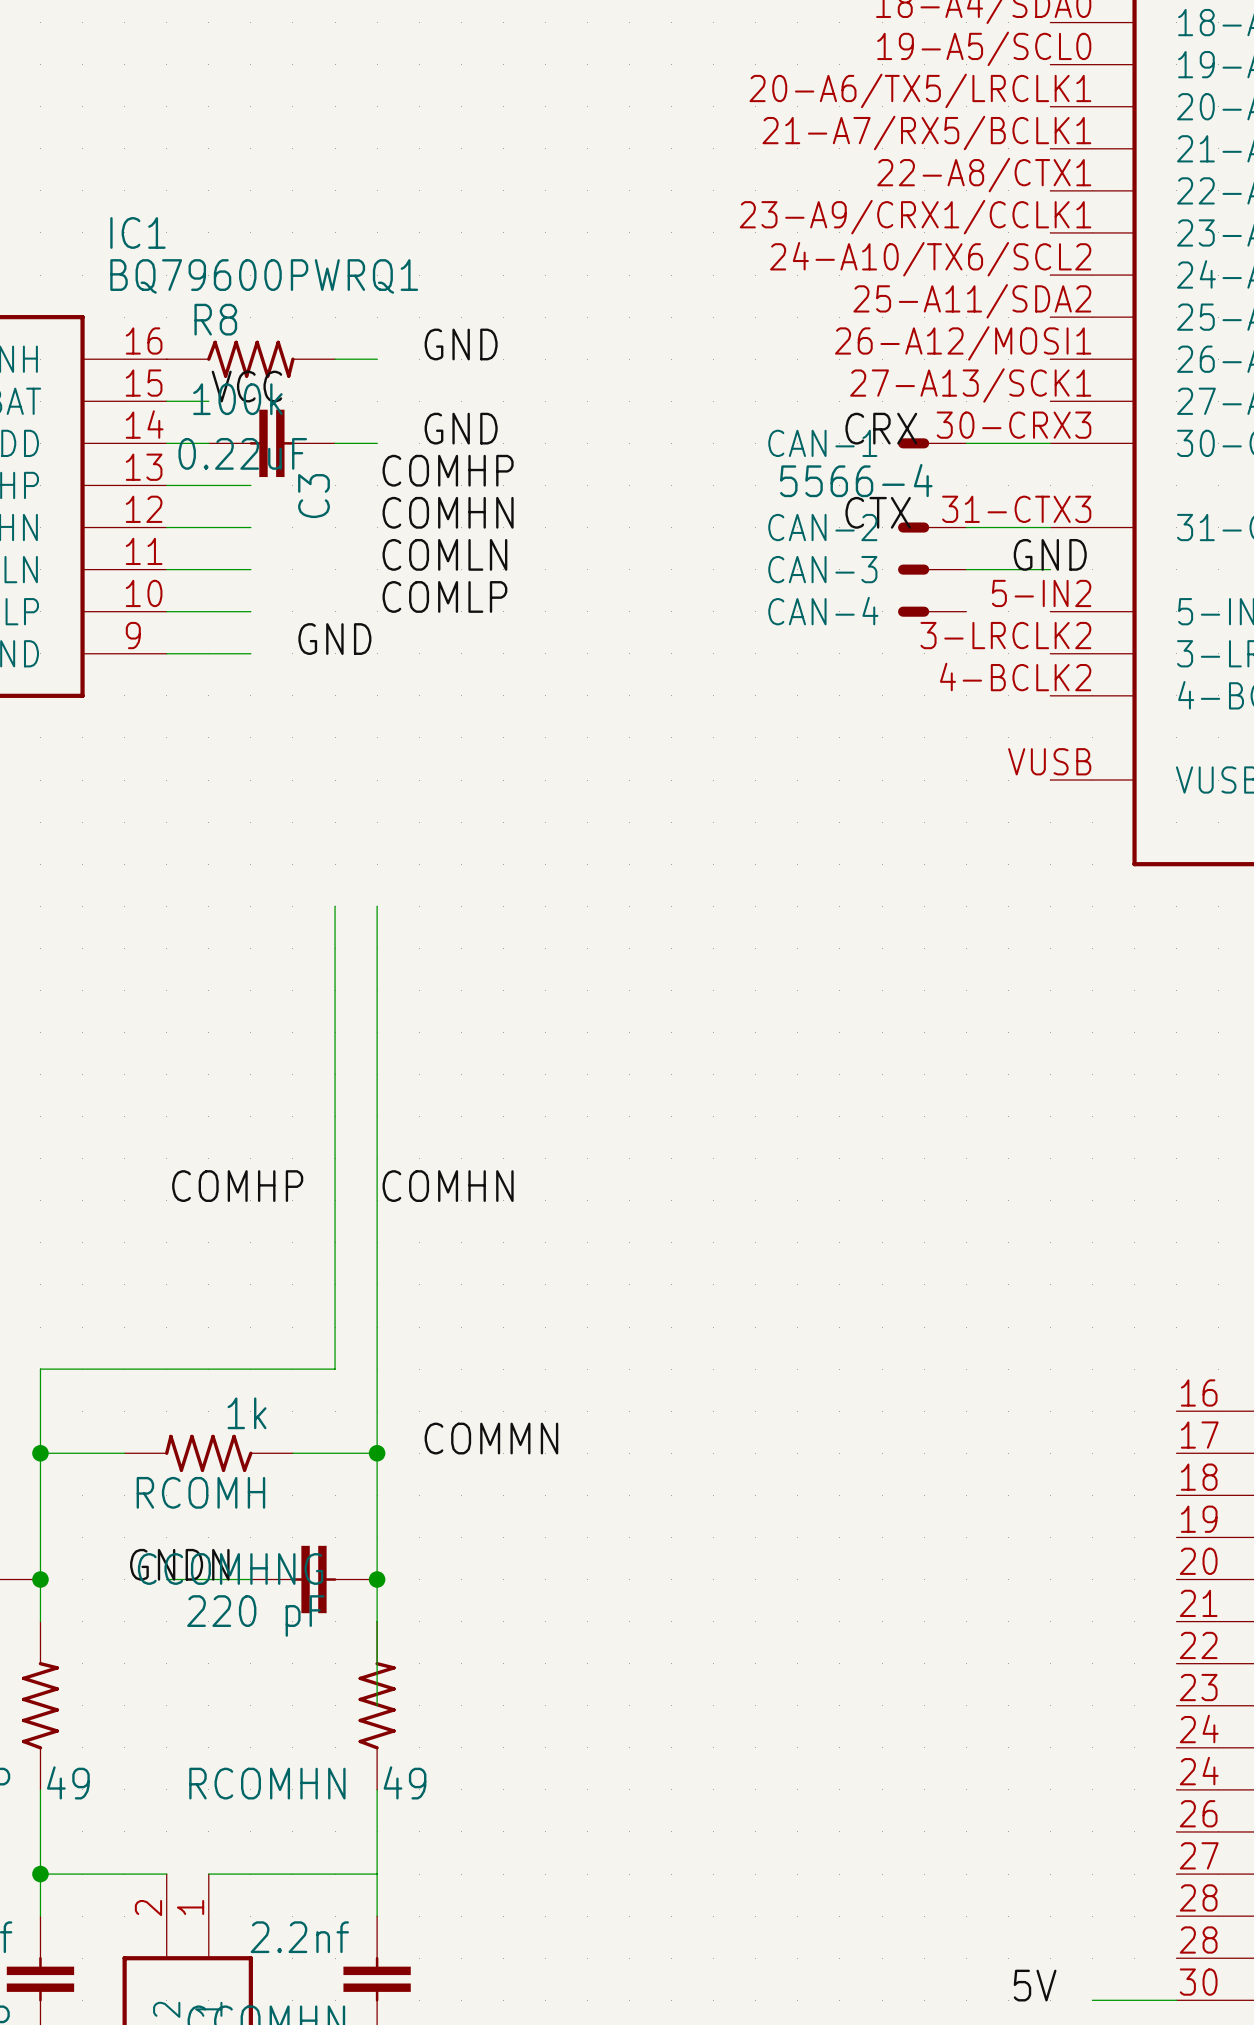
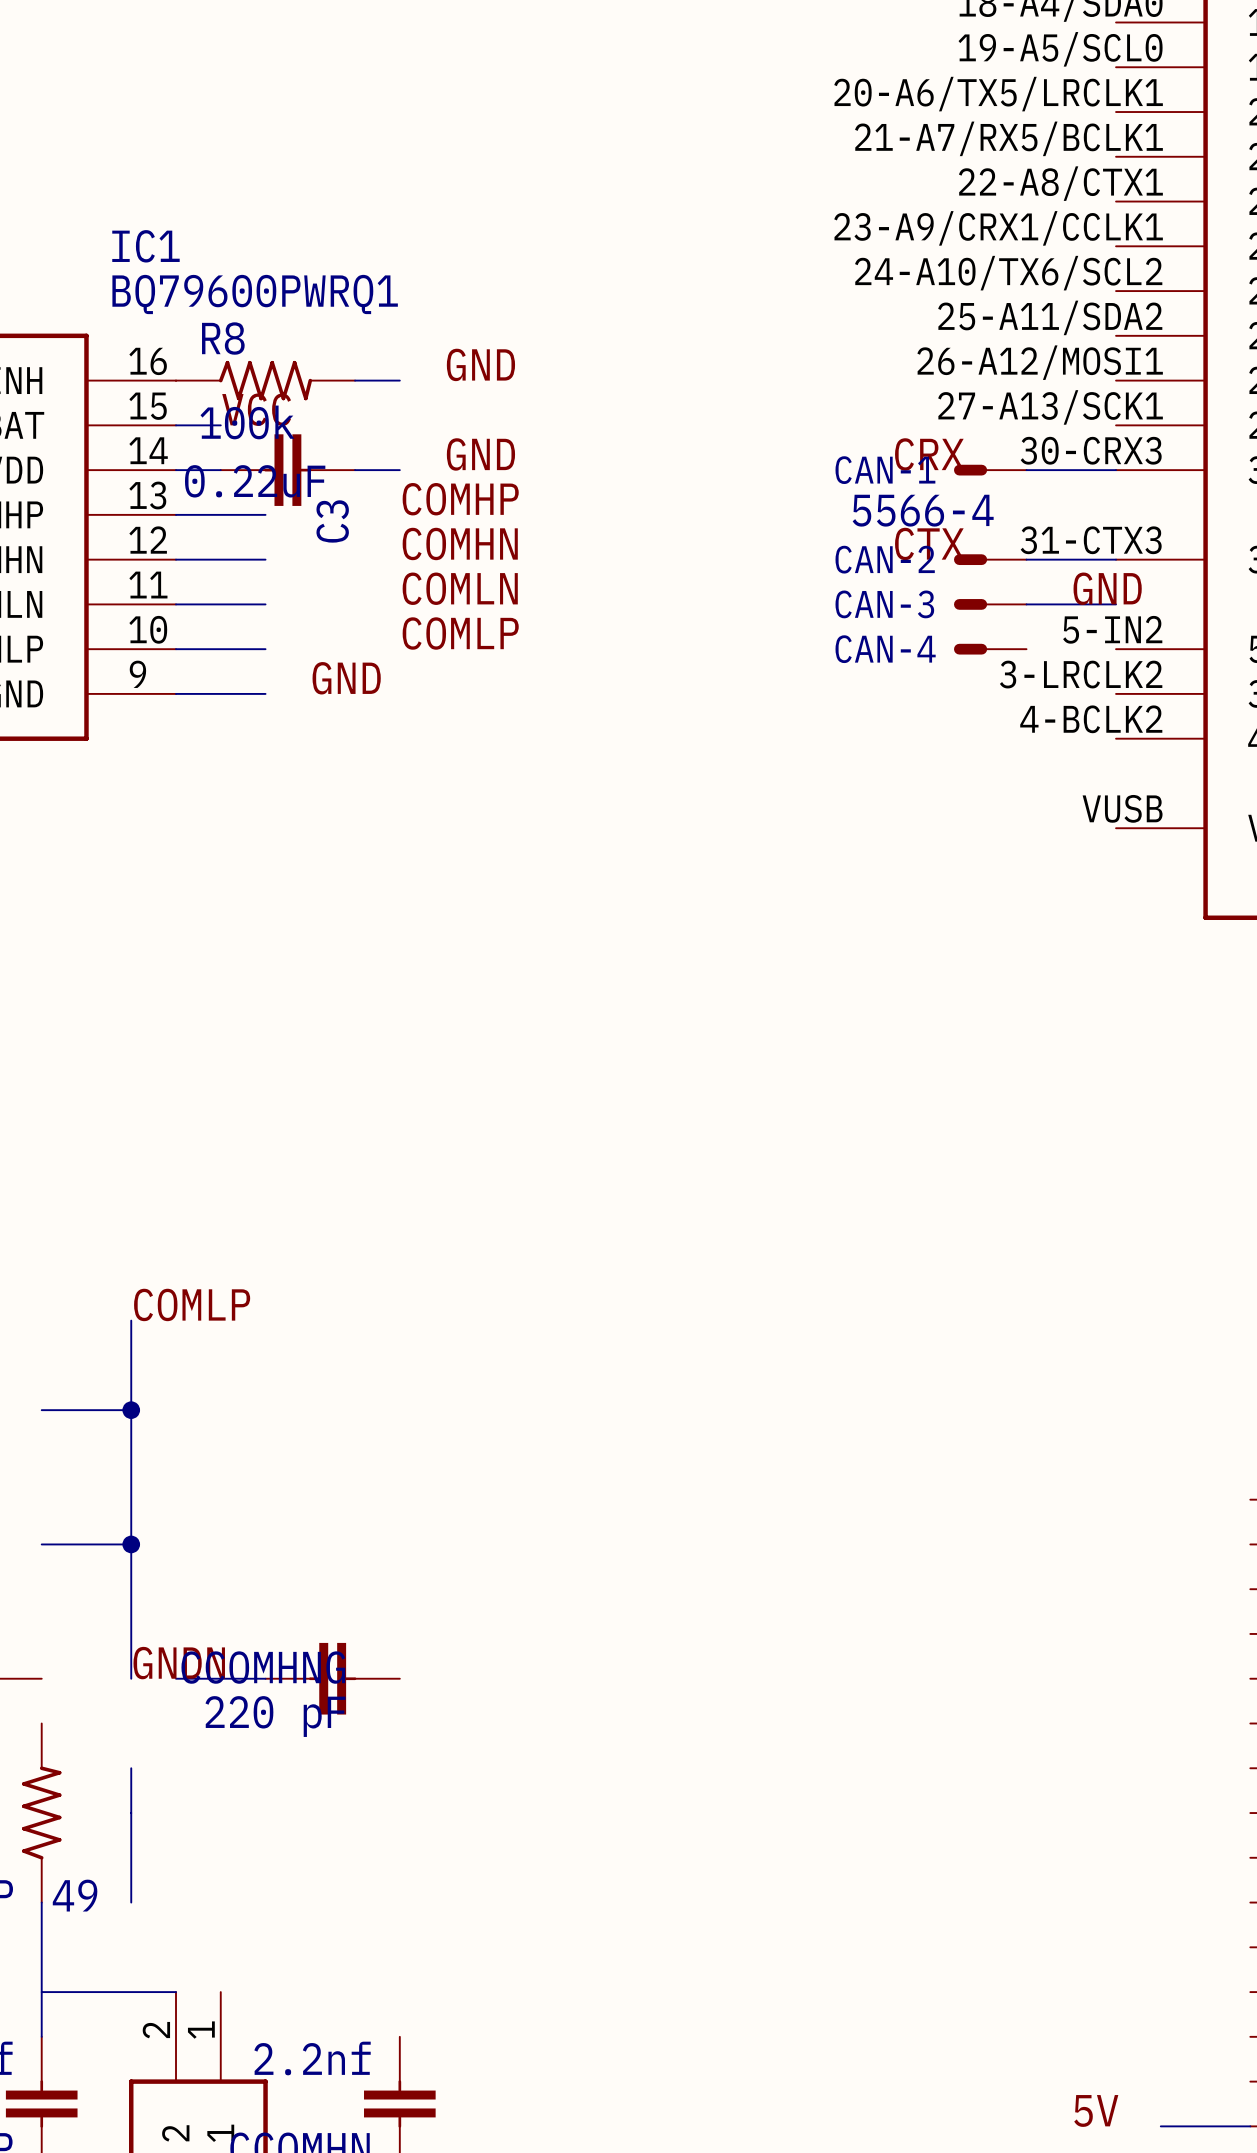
wire: (335, 906) (335, 1369) (40, 1369) (40, 1621) -> none
wire: (377, 906) (377, 1705) -> none
label: COMHP (237, 1186) -> COMLP (192, 1304)
label: COMHN (448, 1186) -> none
wire: none -> (131, 1320) (131, 1678)
junction: none -> (131, 1410)
label: COMMN (491, 1438) -> none
junction: (40, 1453) -> none
junction: none -> (131, 1544)
RCOMH: 1k (208, 1453) -> none
wire: (292, 1453) (377, 1453) -> (41, 1410) (131, 1410)
junction: (377, 1453) -> none
junction: (40, 1579) -> none
junction: (377, 1579) -> none
RCOMHN: 49 (377, 1705) -> none
wire: (377, 1789) (377, 1916) -> (131, 1768) (131, 1902)
junction: (40, 1874) -> none
wire: (208, 1874) (377, 1874) -> none

